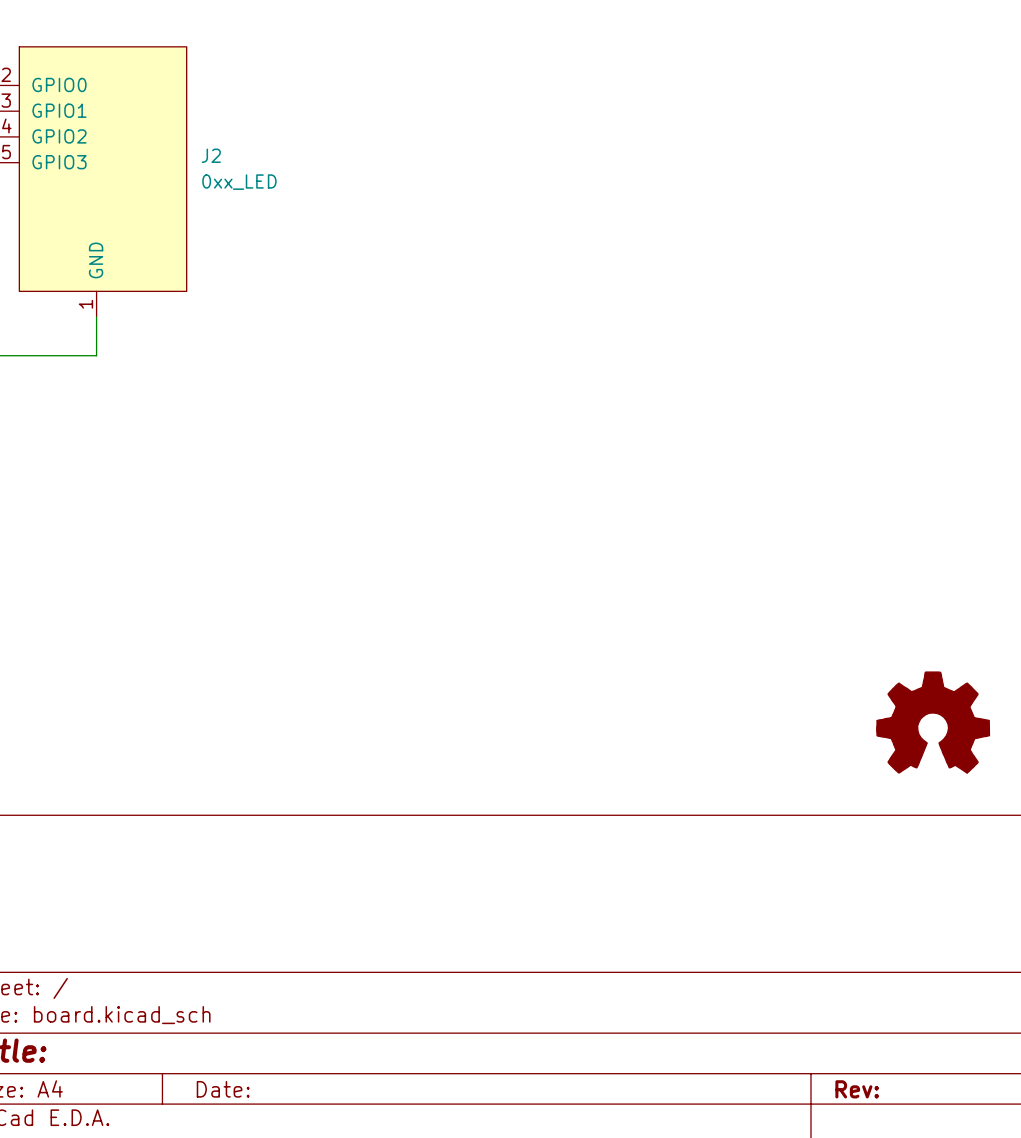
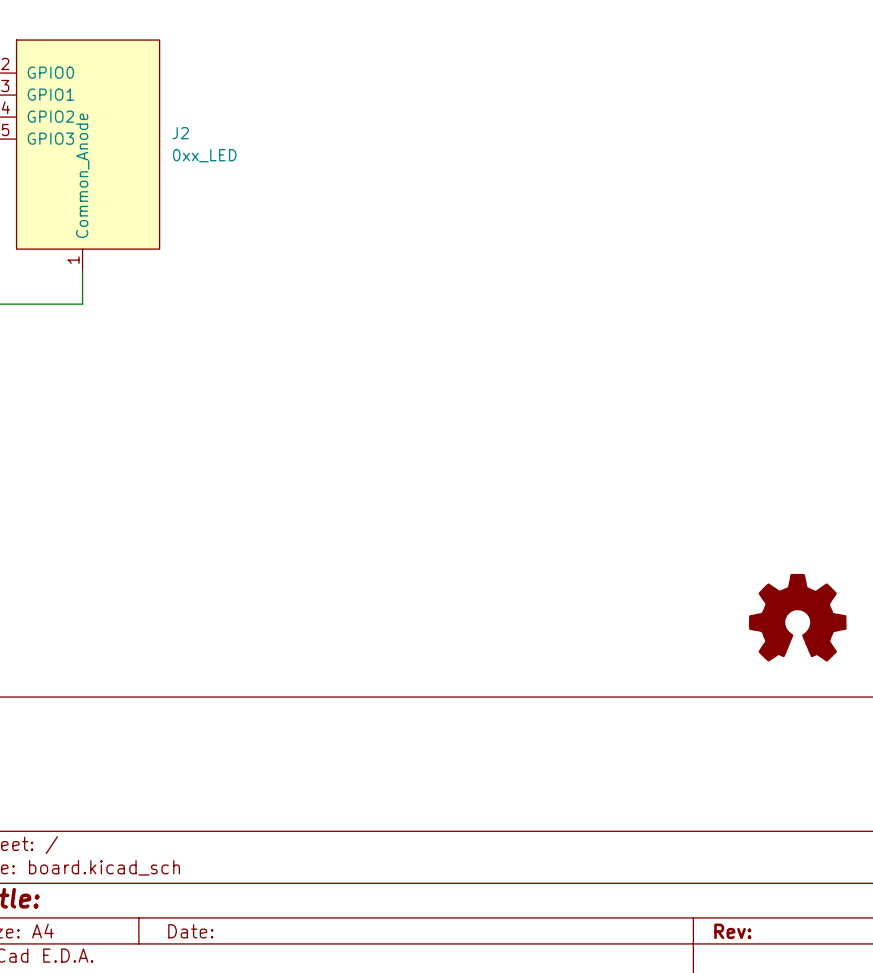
J2 pin name: GND (96, 260) -> Common_Anode (82, 175)

